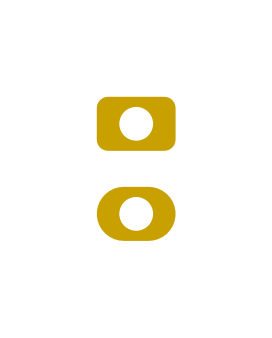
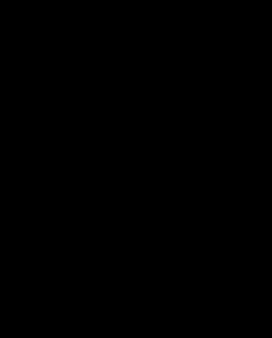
part: (136, 168) -> none

